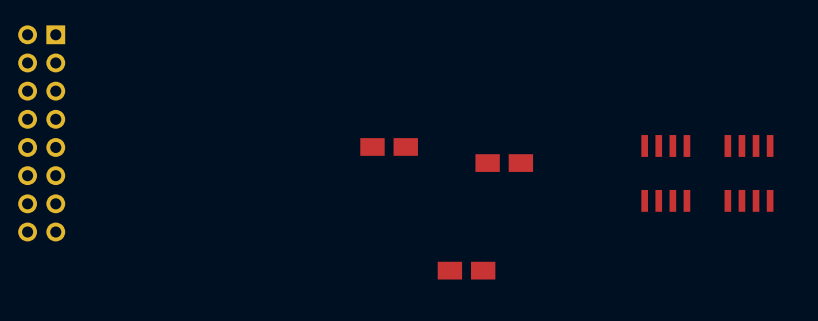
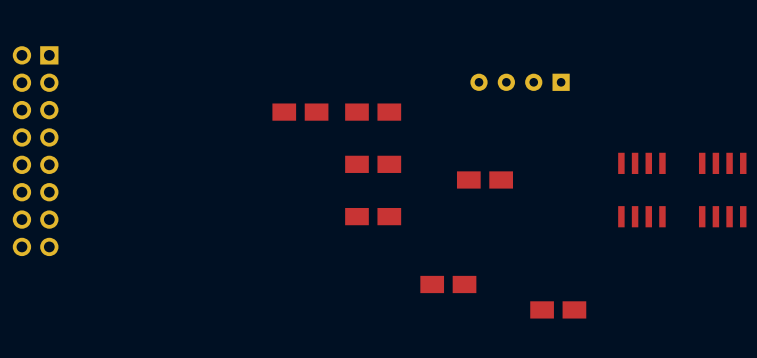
part: none -> (520, 82)
part: none -> (300, 112)
part: none -> (373, 112)
part: none -> (373, 216)
part: none -> (558, 309)

